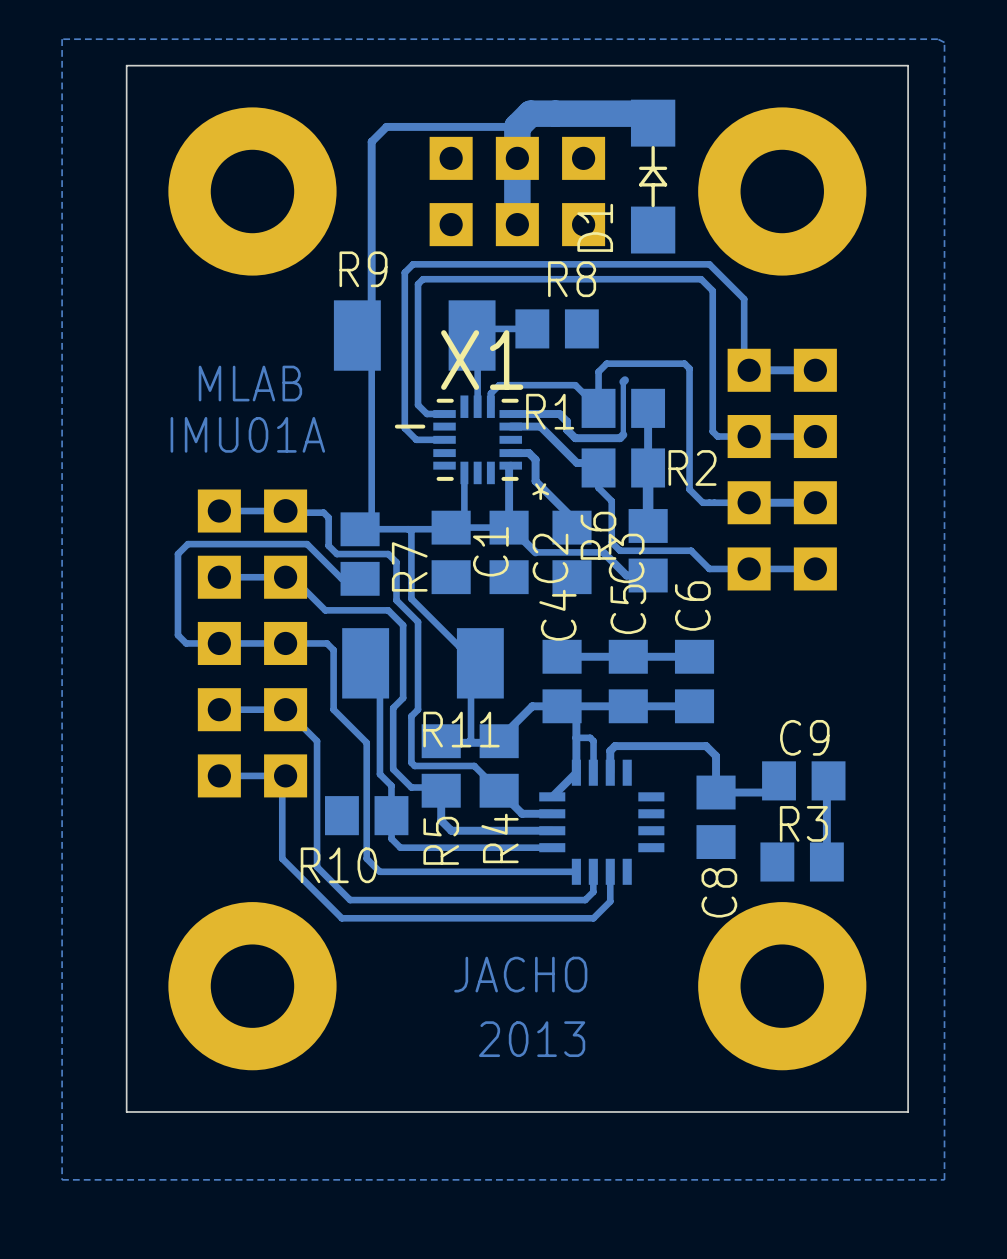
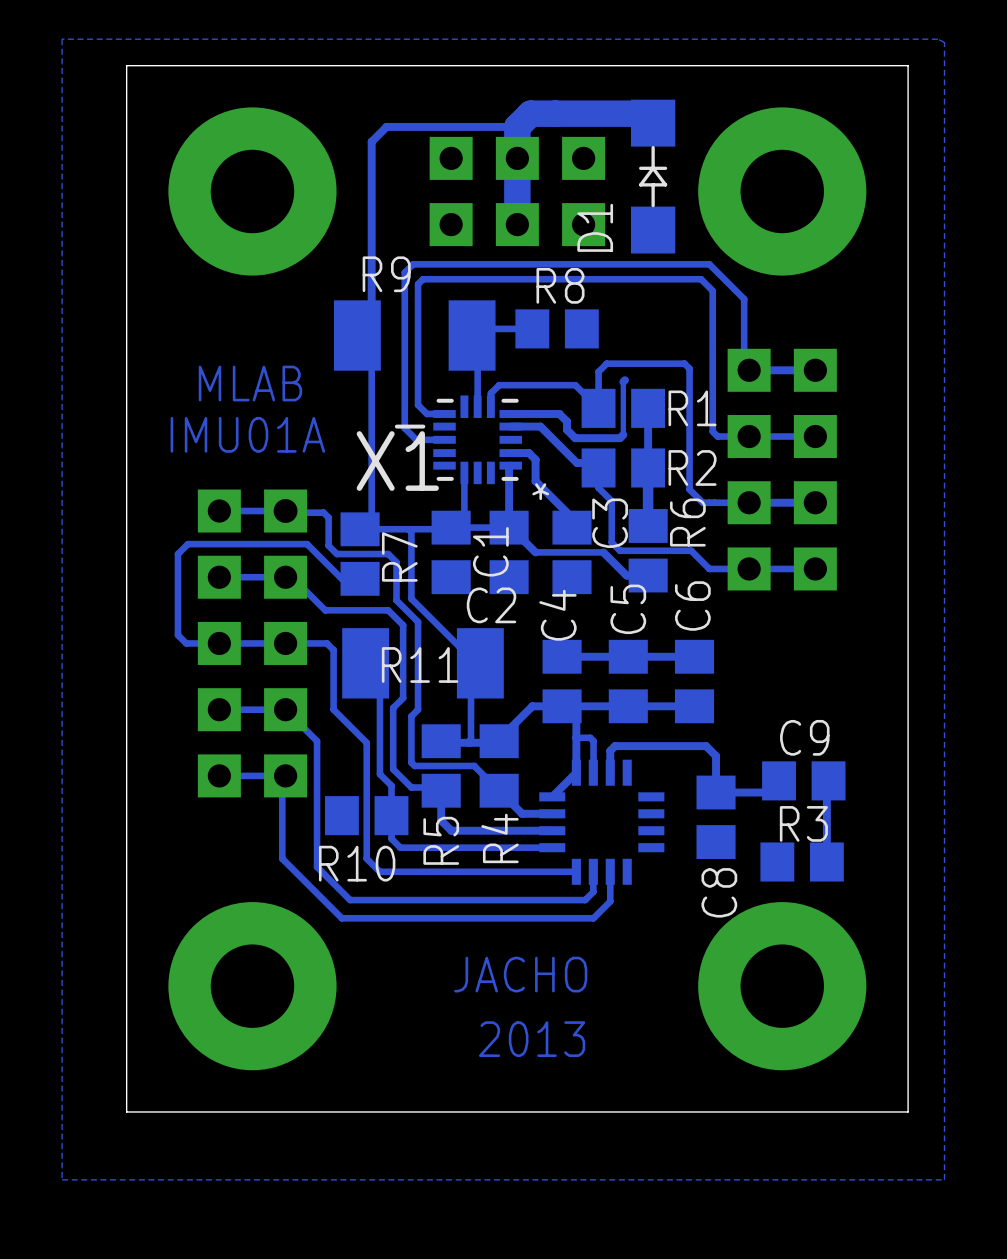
R9 name position: R9 (363, 269) -> R9 (386, 274)
R8 name position: R8 (572, 279) -> R8 (560, 285)
X1 name position: X1 (482, 360) -> X1 (397, 461)
R1 name position: R1 (550, 411) -> R1 (692, 408)
R6 name position: R6 (598, 535) -> R6 (687, 522)
C2 name rotation: 0° (550, 558) -> 90° clockwise (491, 605)
C2 name position: C2 (550, 558) -> C2 (491, 605)
C3 name position: C3 (626, 558) -> C3 (610, 523)
R7 name position: R7 (409, 566) -> R7 (399, 556)
R11 name position: R11 (461, 729) -> R11 (420, 664)
R10 name position: R10 (338, 865) -> R10 (357, 863)

